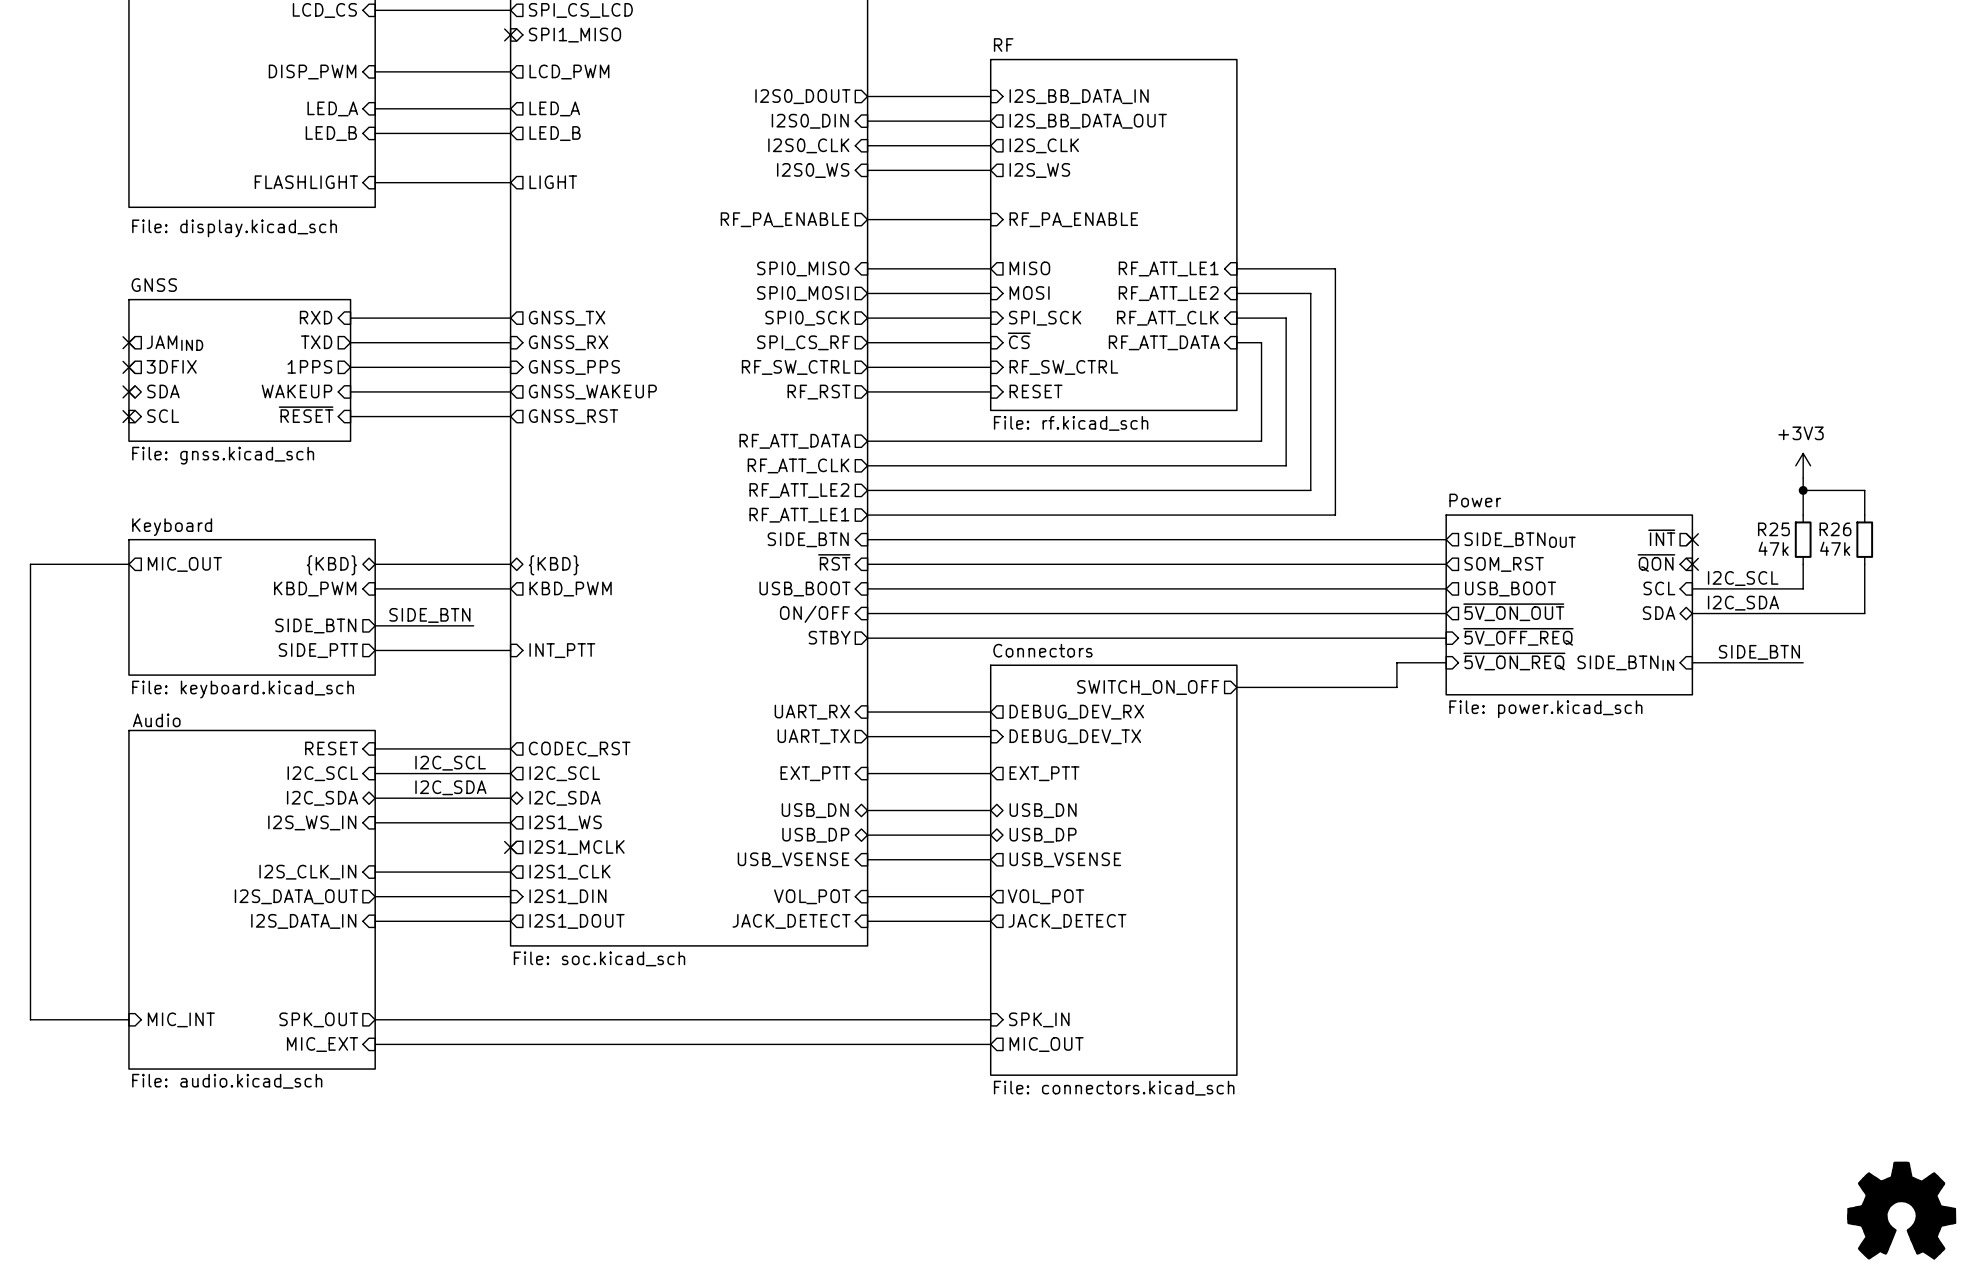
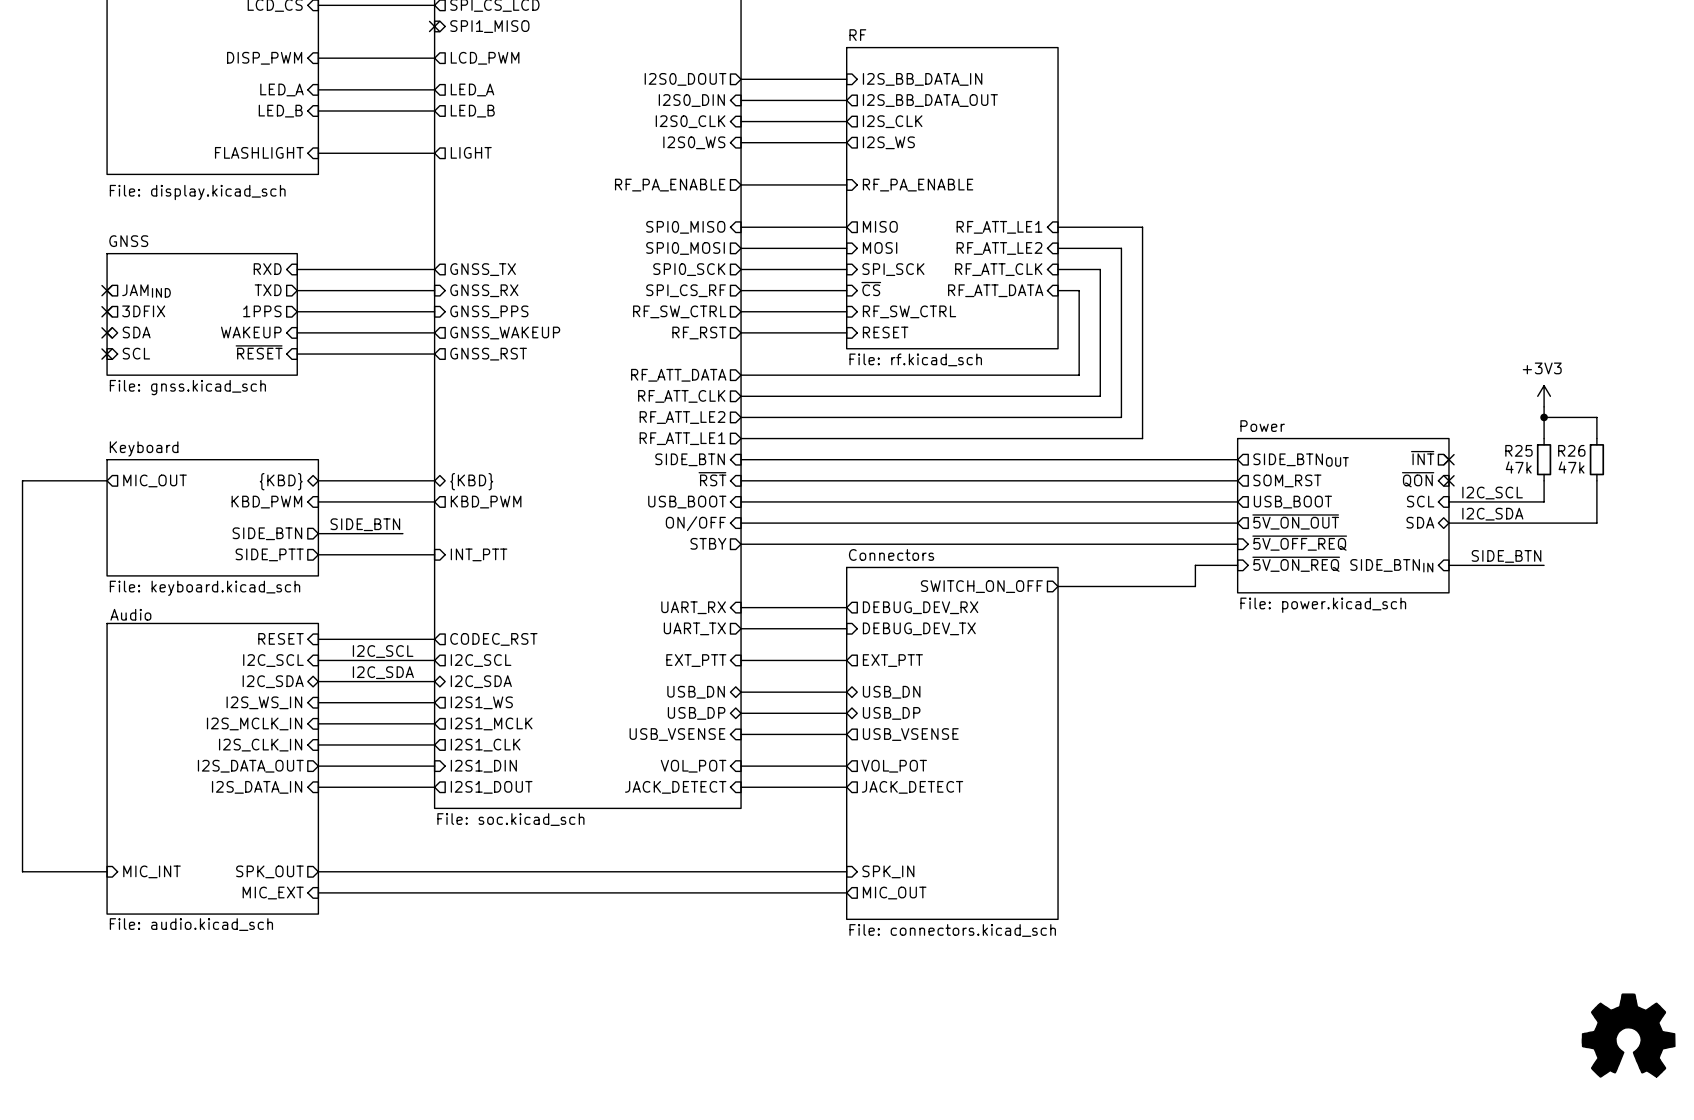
sheet pin: none -> I2S_MCLK_IN (254, 723)
wire: none -> (318, 723) (434, 723)
no-connect mark: (510, 847) -> none

